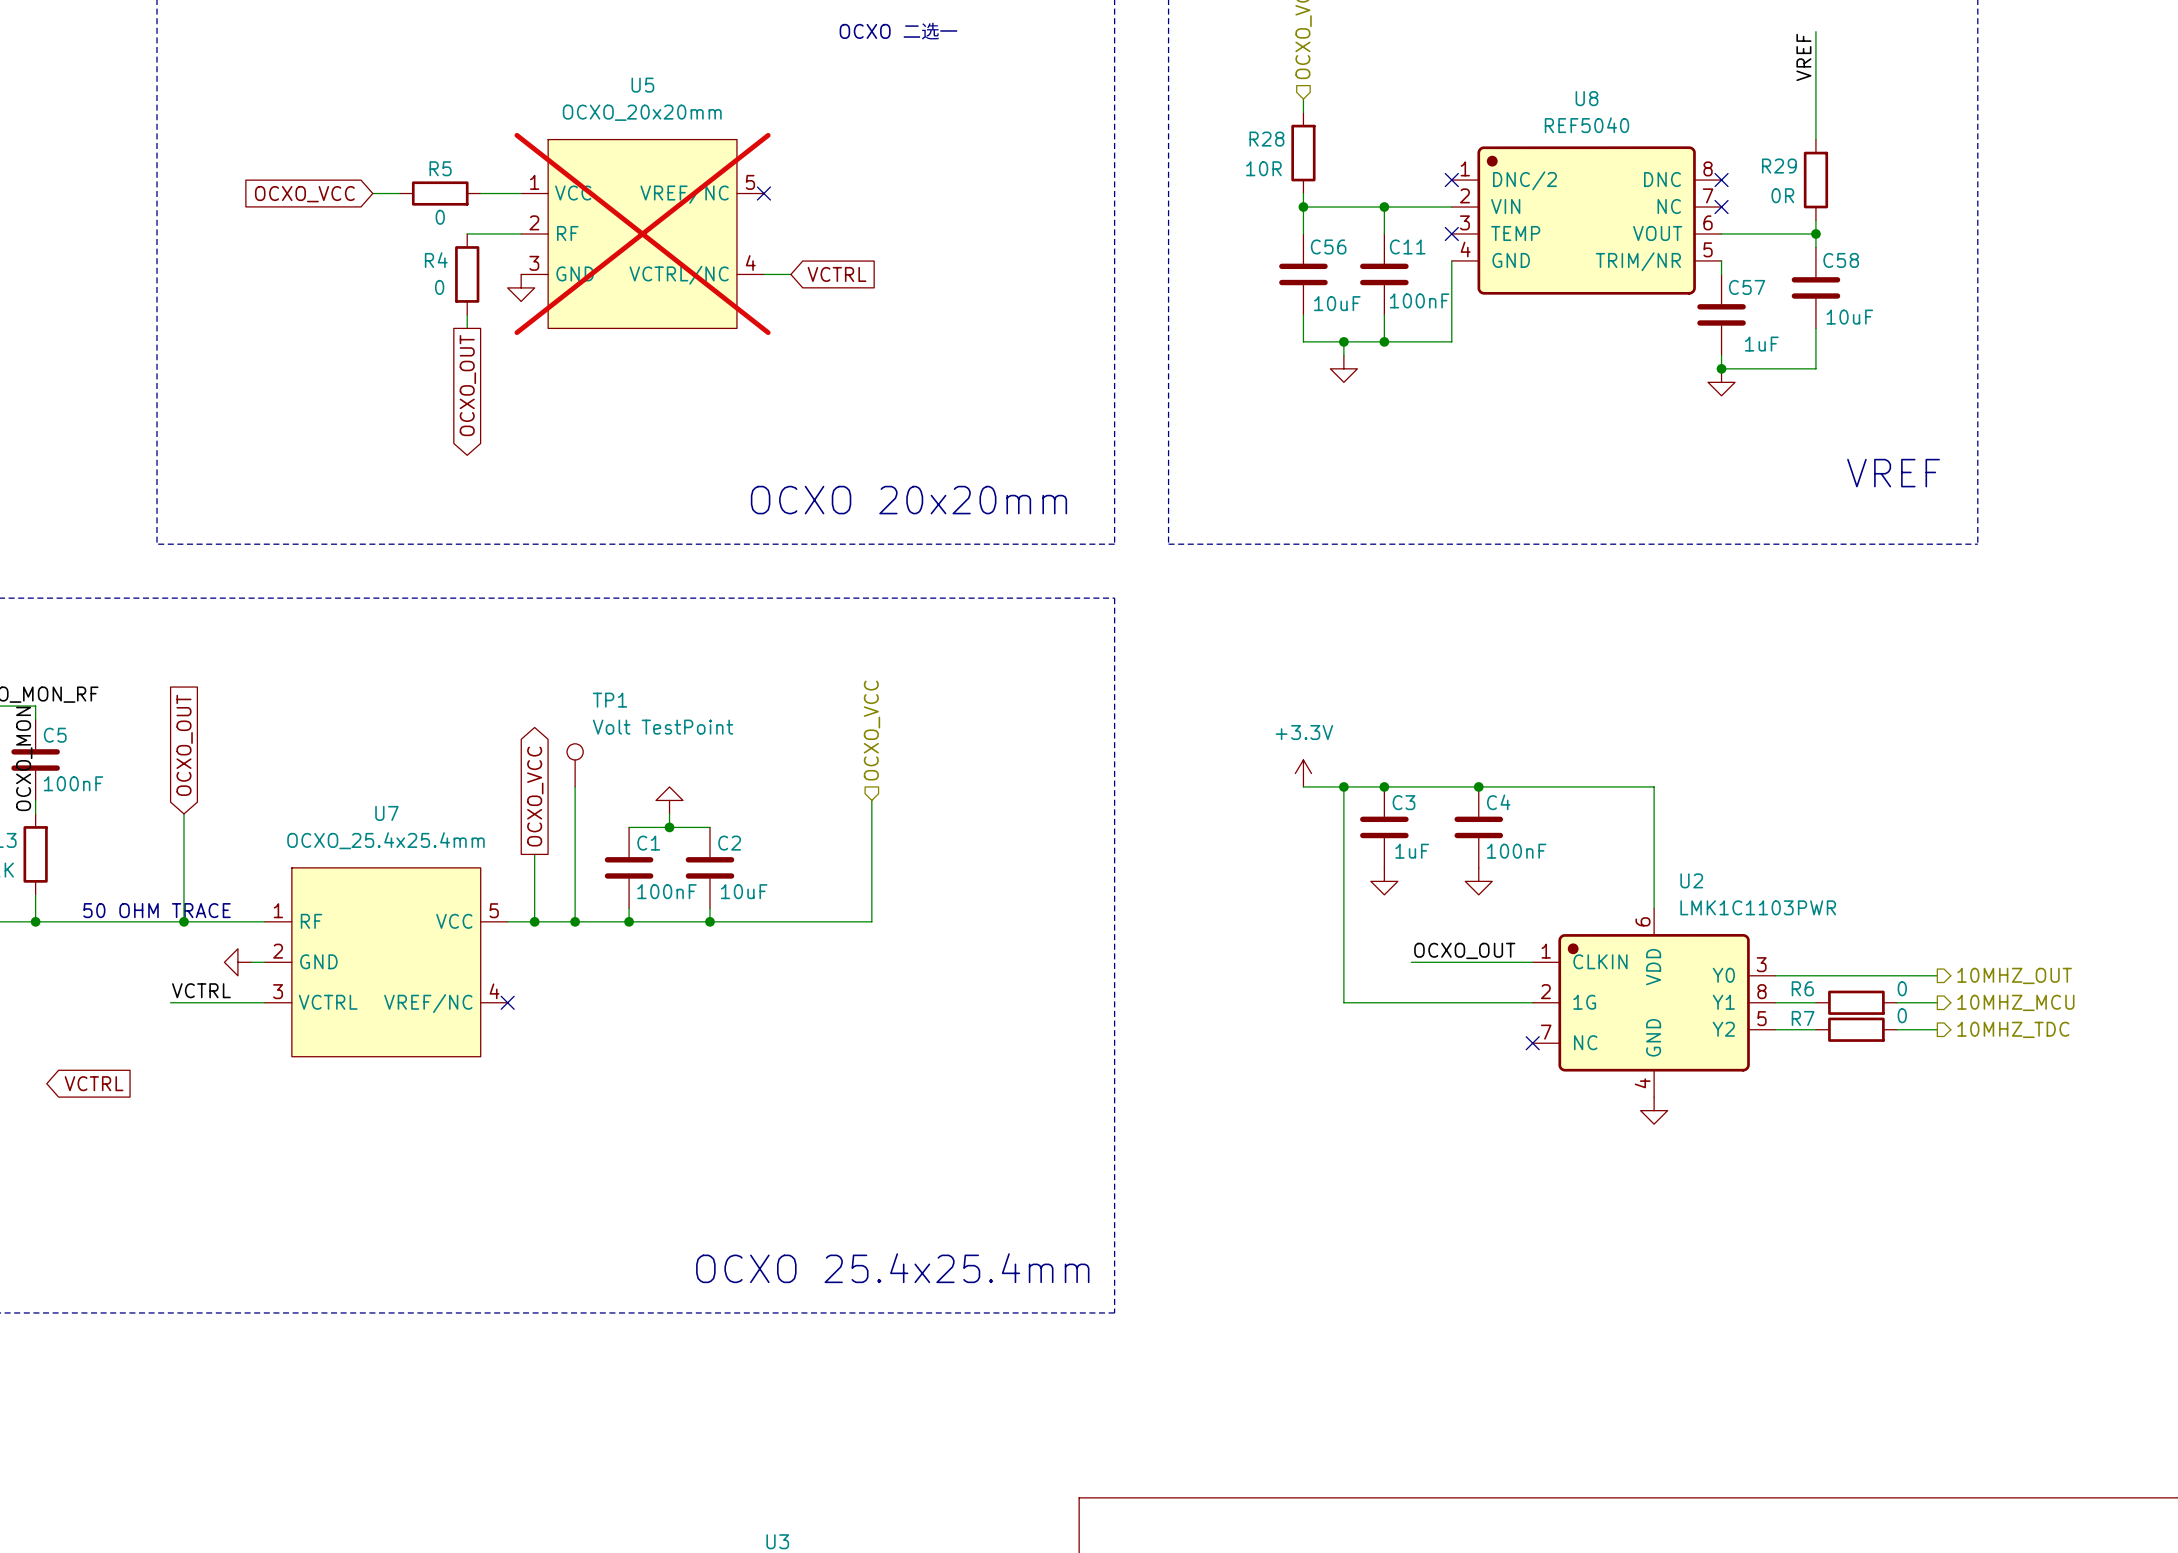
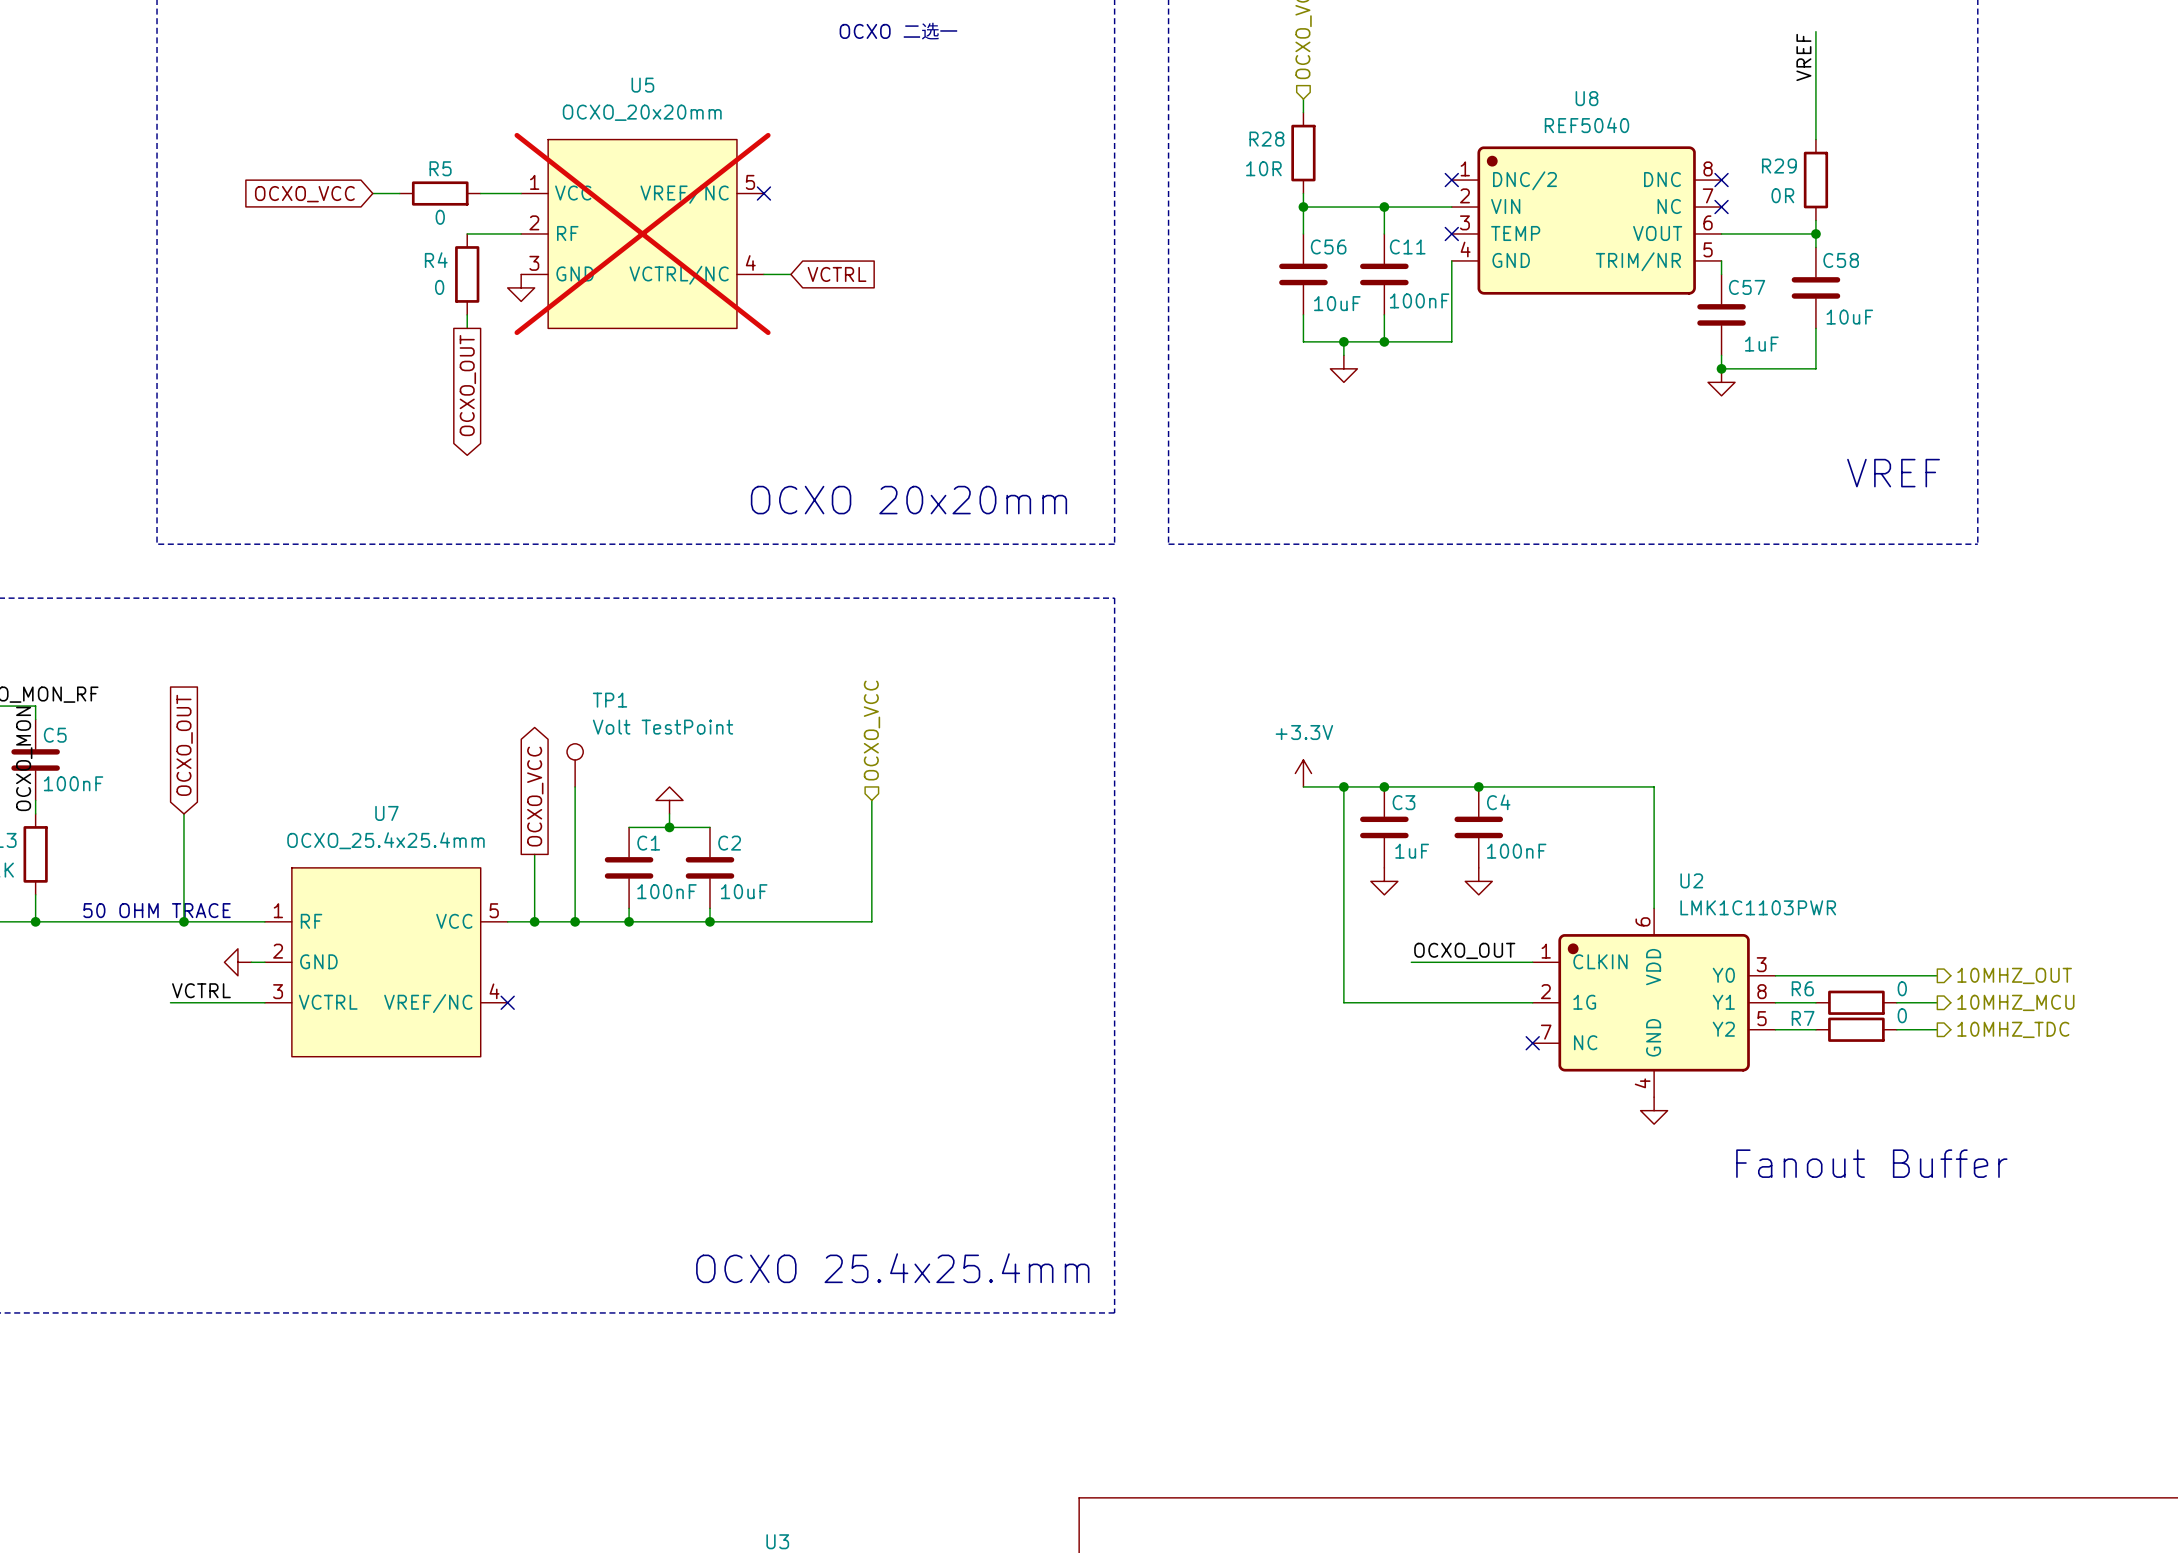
global label: VCTRL (94, 1083) -> none
text: none -> Fanout Buffer (1871, 1163)

